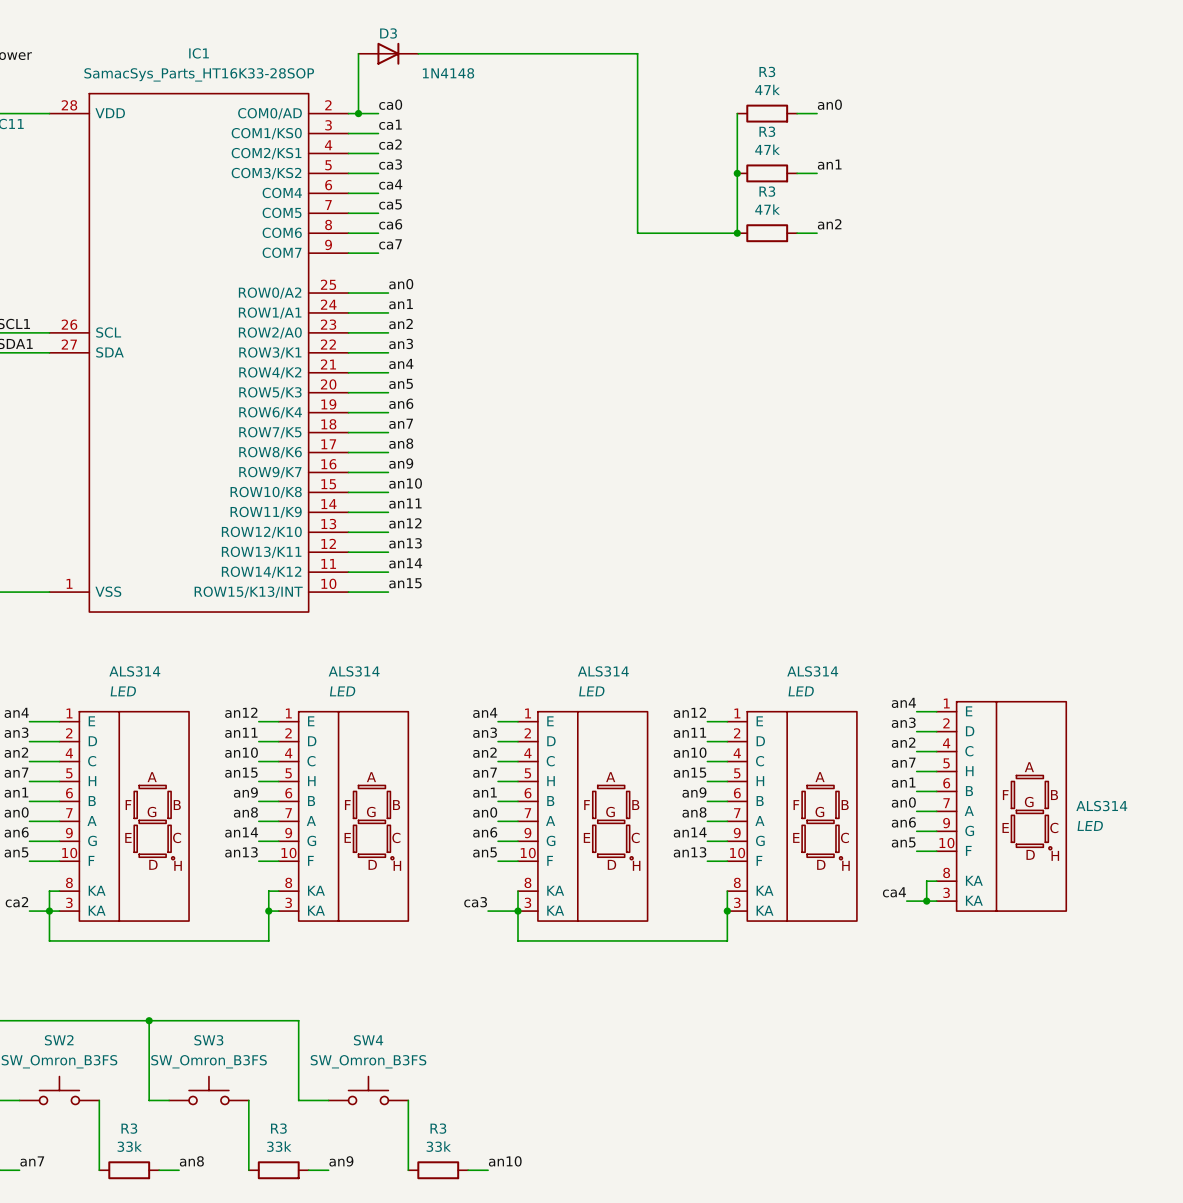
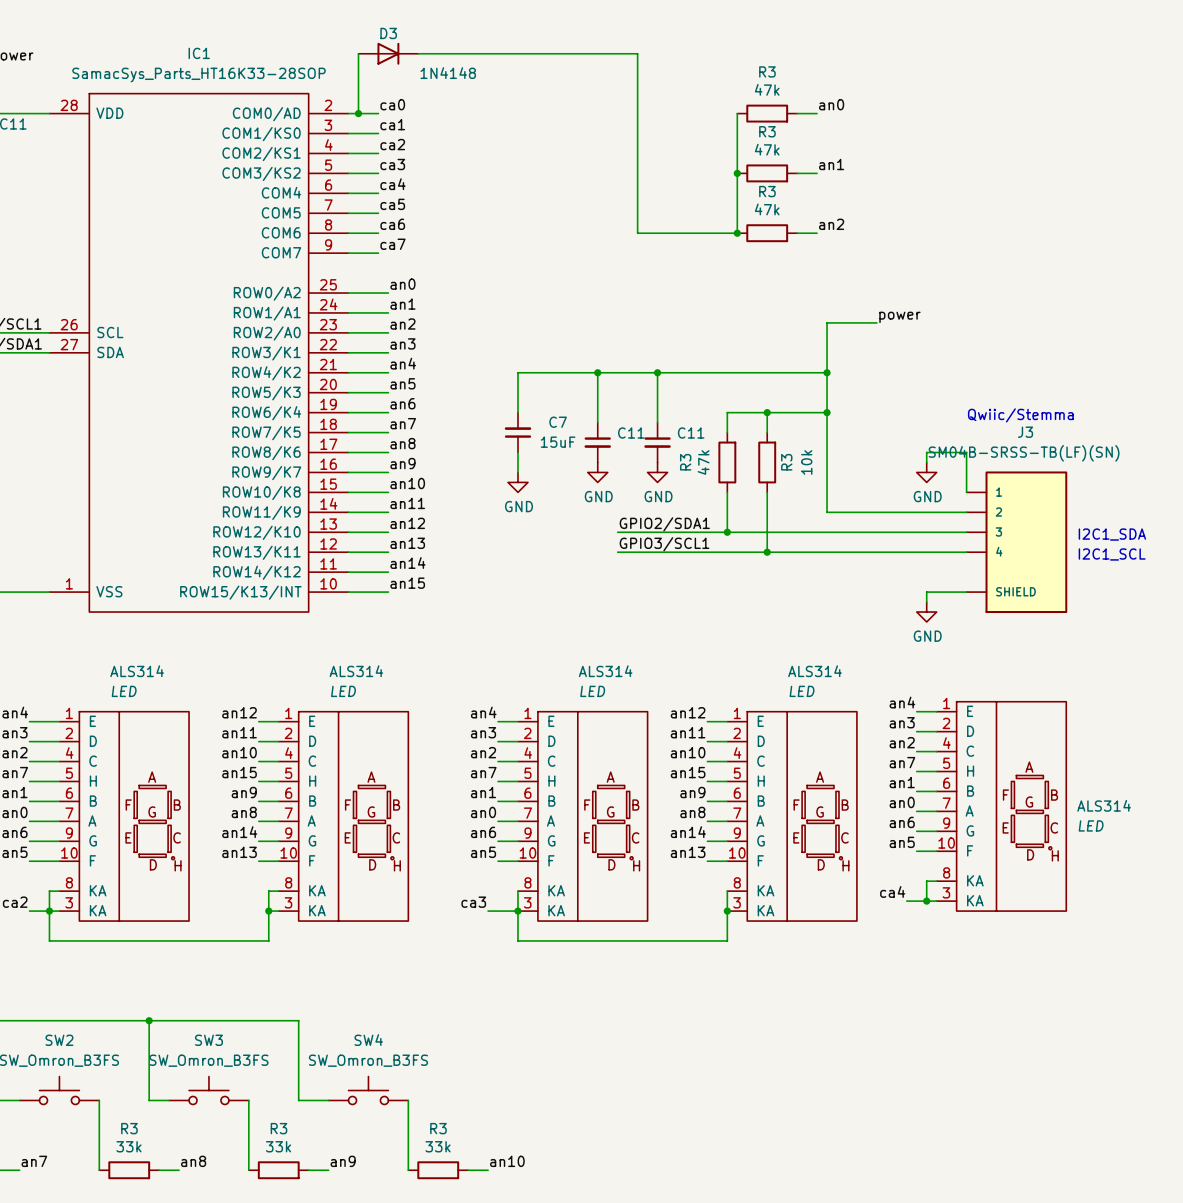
label: none -> power (899, 317)
wire: none -> (876, 322) (827, 322) (827, 512) (966, 512)
wire: none -> (597, 372) (597, 422)
junction: none -> (597, 372)
wire: none -> (657, 372) (657, 422)
junction: none -> (657, 372)
wire: none -> (827, 372) (517, 372) (517, 412)
junction: none -> (827, 372)
wire: none -> (767, 412) (767, 432)
junction: none -> (767, 412)
wire: none -> (827, 412) (727, 412) (727, 432)
junction: none -> (827, 412)
text: none -> Qwiic/Stemma (1020, 415)
C7: none -> 15uF (517, 432)
C11: none -> (597, 442)
C11: none -> (657, 442)
wire: none -> (517, 452) (517, 472)
R3: none -> 47k (727, 462)
R3: none -> 10k (767, 462)
wire: none -> (926, 462) (926, 452) (966, 452) (966, 492)
power symbol: none -> GND (597, 472)
power symbol: none -> GND (657, 472)
power symbol: none -> GND (926, 472)
power symbol: none -> GND (517, 482)
wire: none -> (727, 492) (727, 532)
wire: none -> (767, 492) (767, 552)
label: none -> GPIO2/SDA1 (664, 524)
wire: none -> (617, 532) (966, 532)
junction: none -> (727, 532)
text: none -> I2C1_SDA (1112, 534)
J3: none -> SM04B-SRSS-TB(LF)(SN) (1016, 542)
label: none -> GPIO3/SCL1 (664, 544)
wire: none -> (617, 552) (966, 552)
junction: none -> (767, 552)
text: none -> I2C1_SCL (1112, 554)
wire: none -> (966, 592) (926, 592) (926, 602)
power symbol: none -> GND (926, 612)

